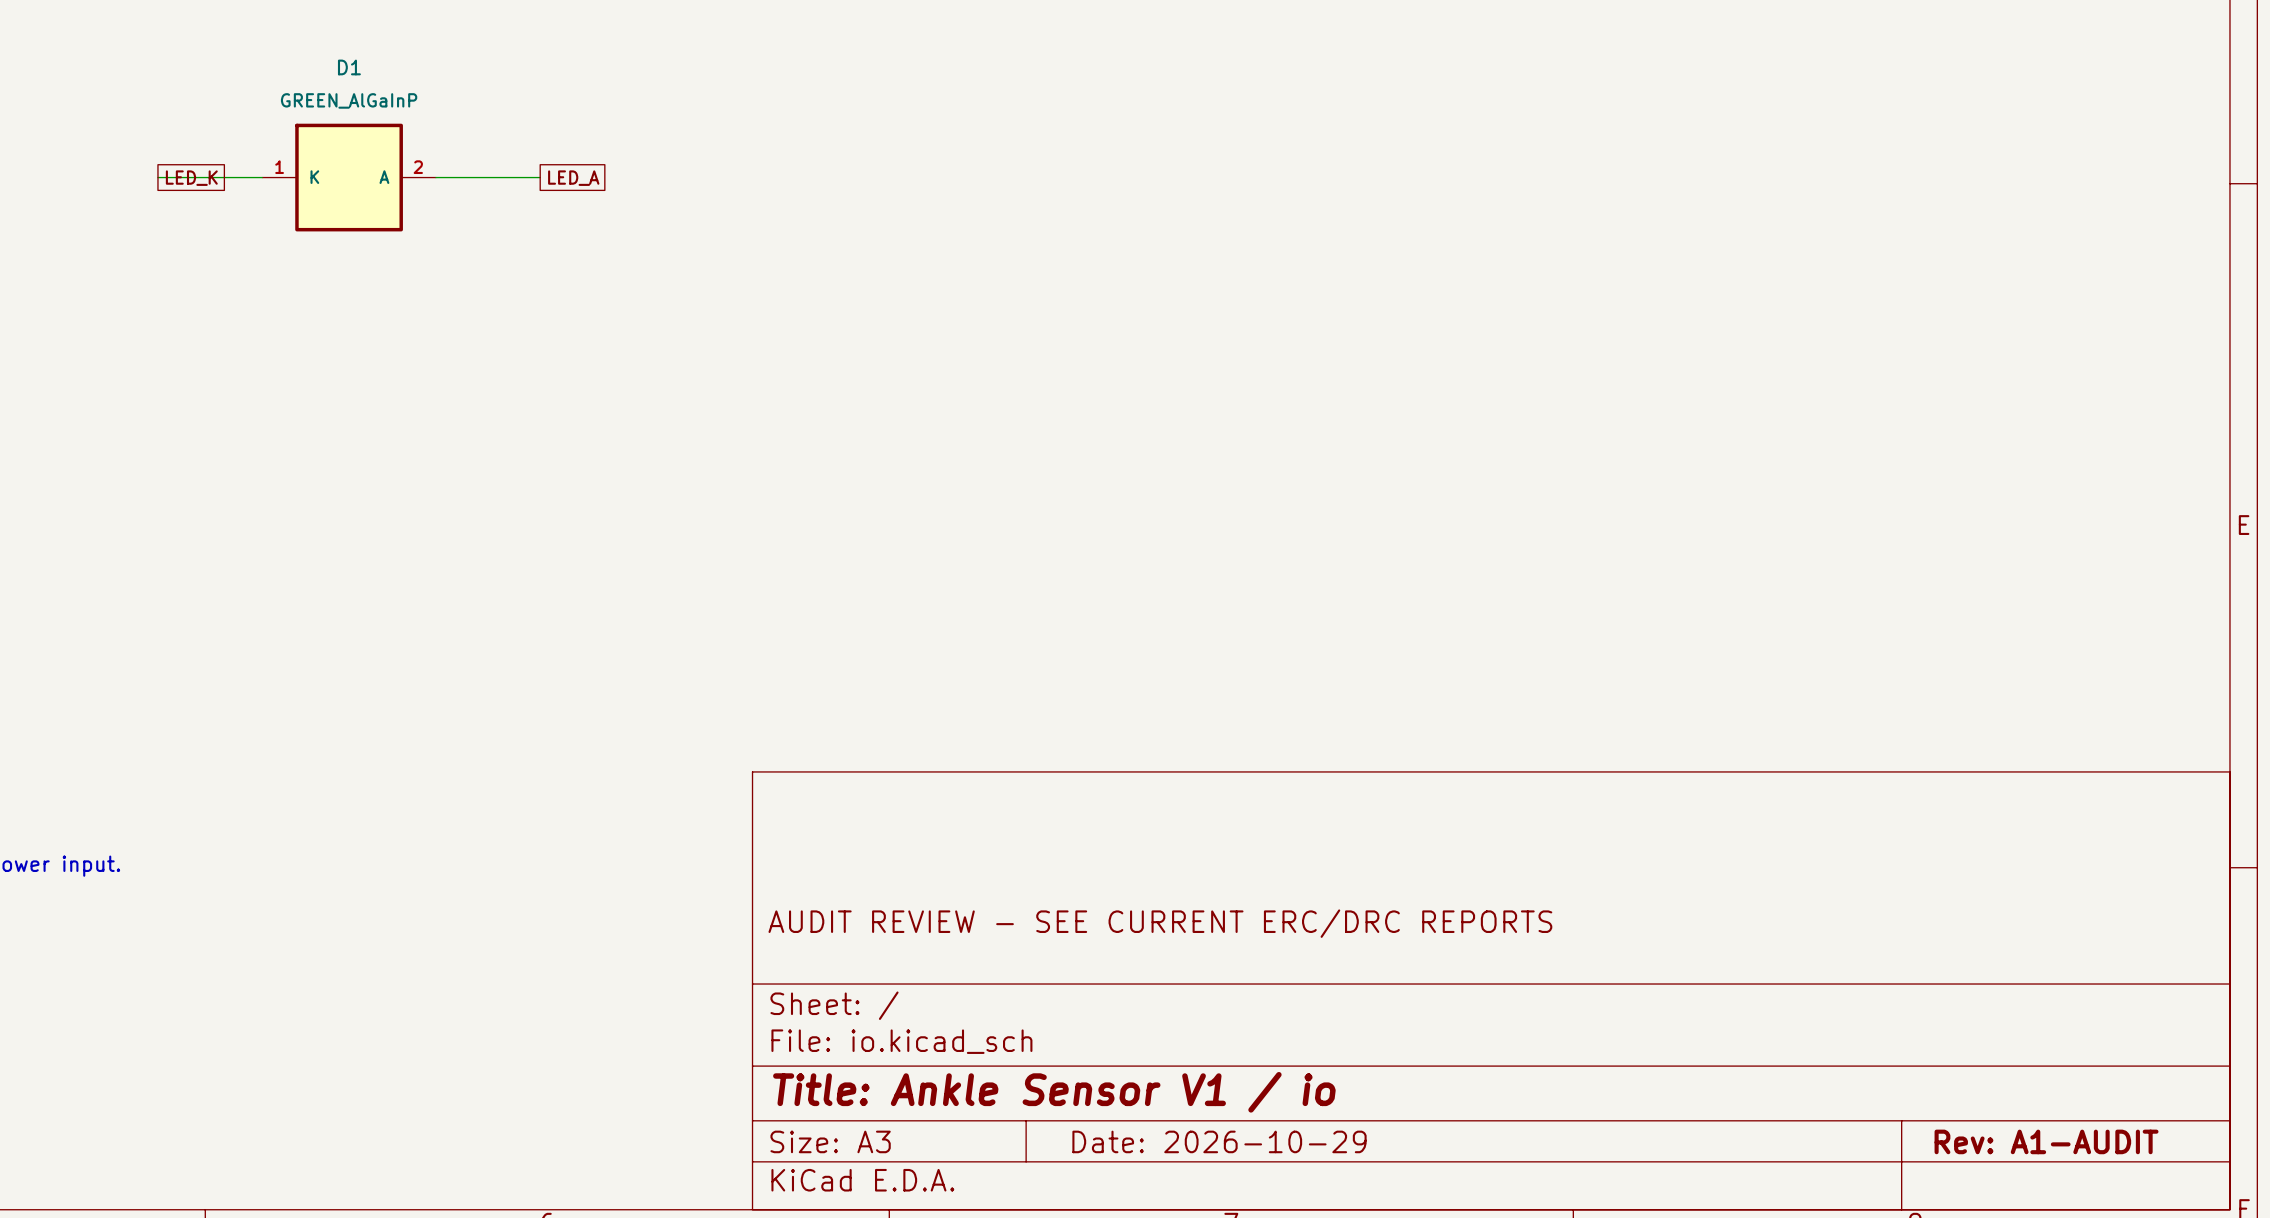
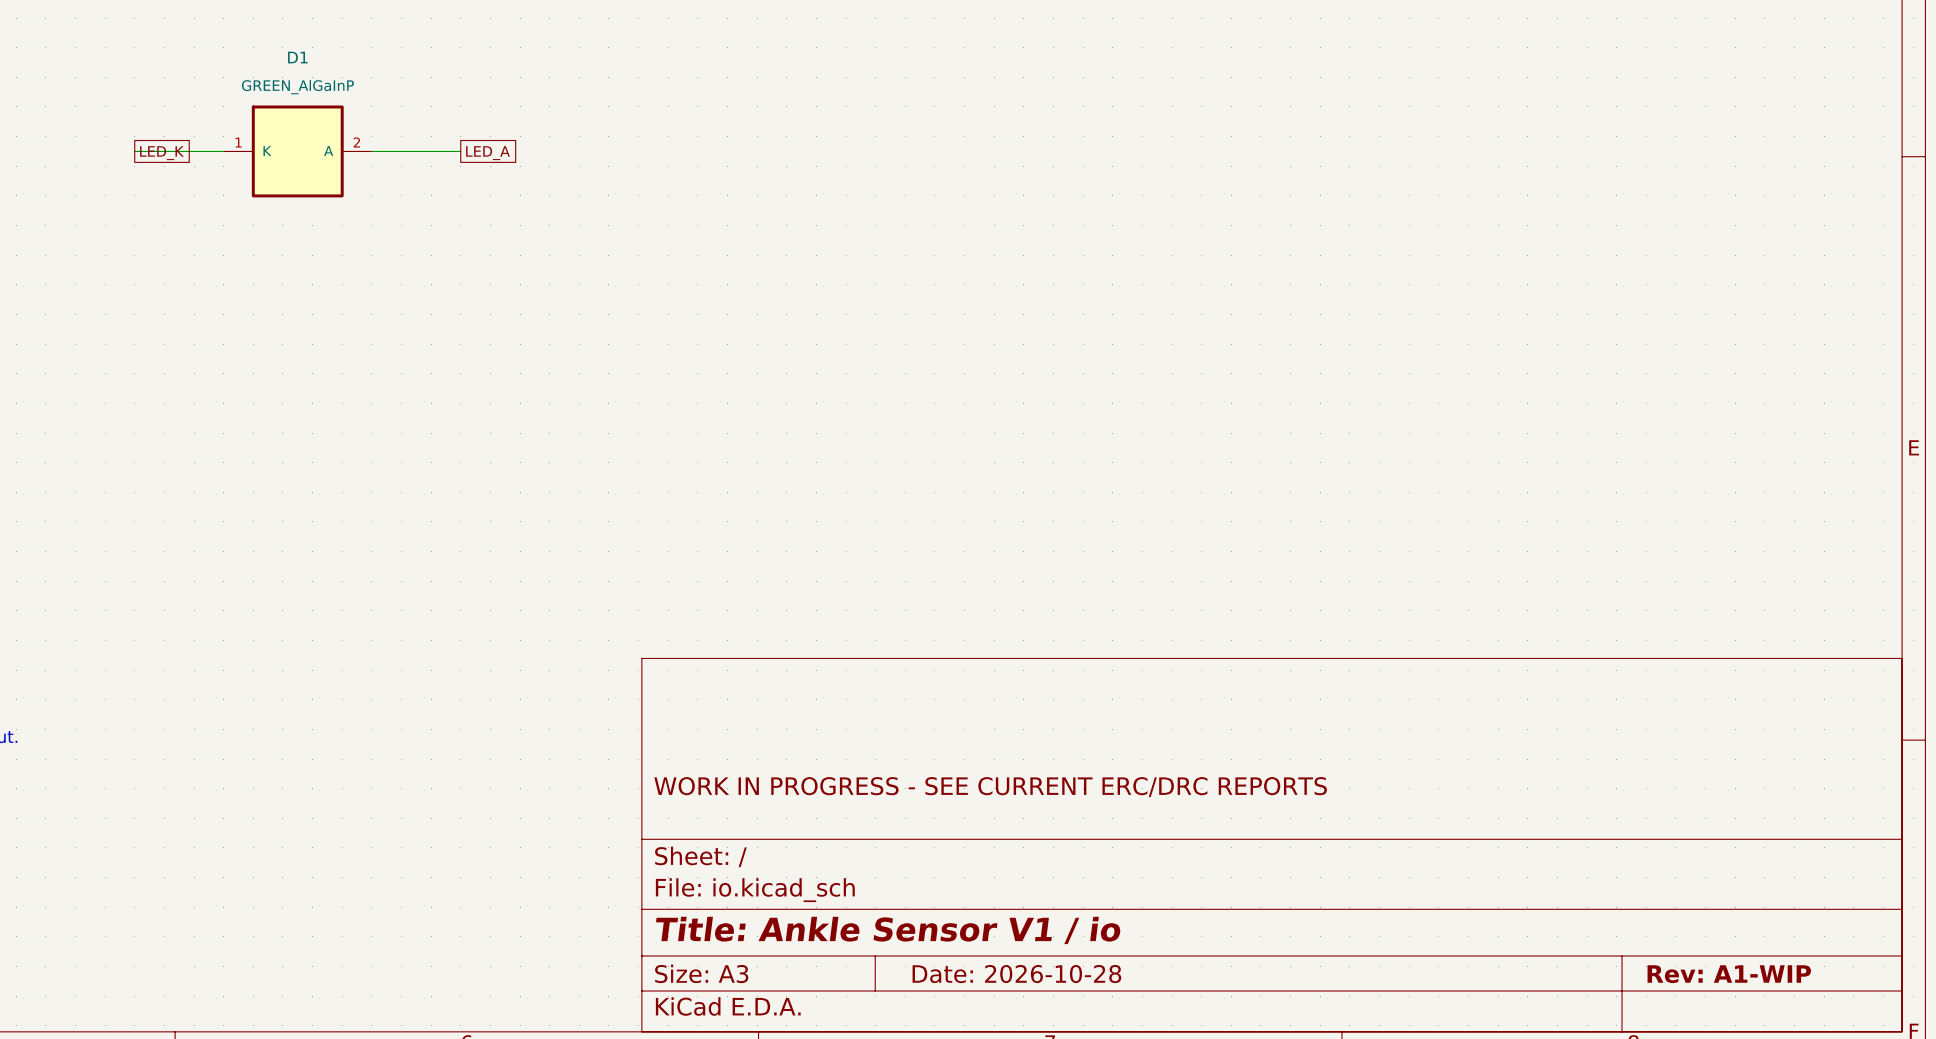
title block: AUDIT REVIEW - SEE CURRENT ERC/DRC REPORTS (1160, 923) -> WORK IN PROGRESS - SEE CURRENT ERC/DRC REPORTS (990, 787)
title block: Date: 2026-10-29 (1219, 1141) -> Date: 2026-10-28 (1016, 974)
title block: Rev: A1-AUDIT (2046, 1141) -> Rev: A1-WIP (1729, 974)

